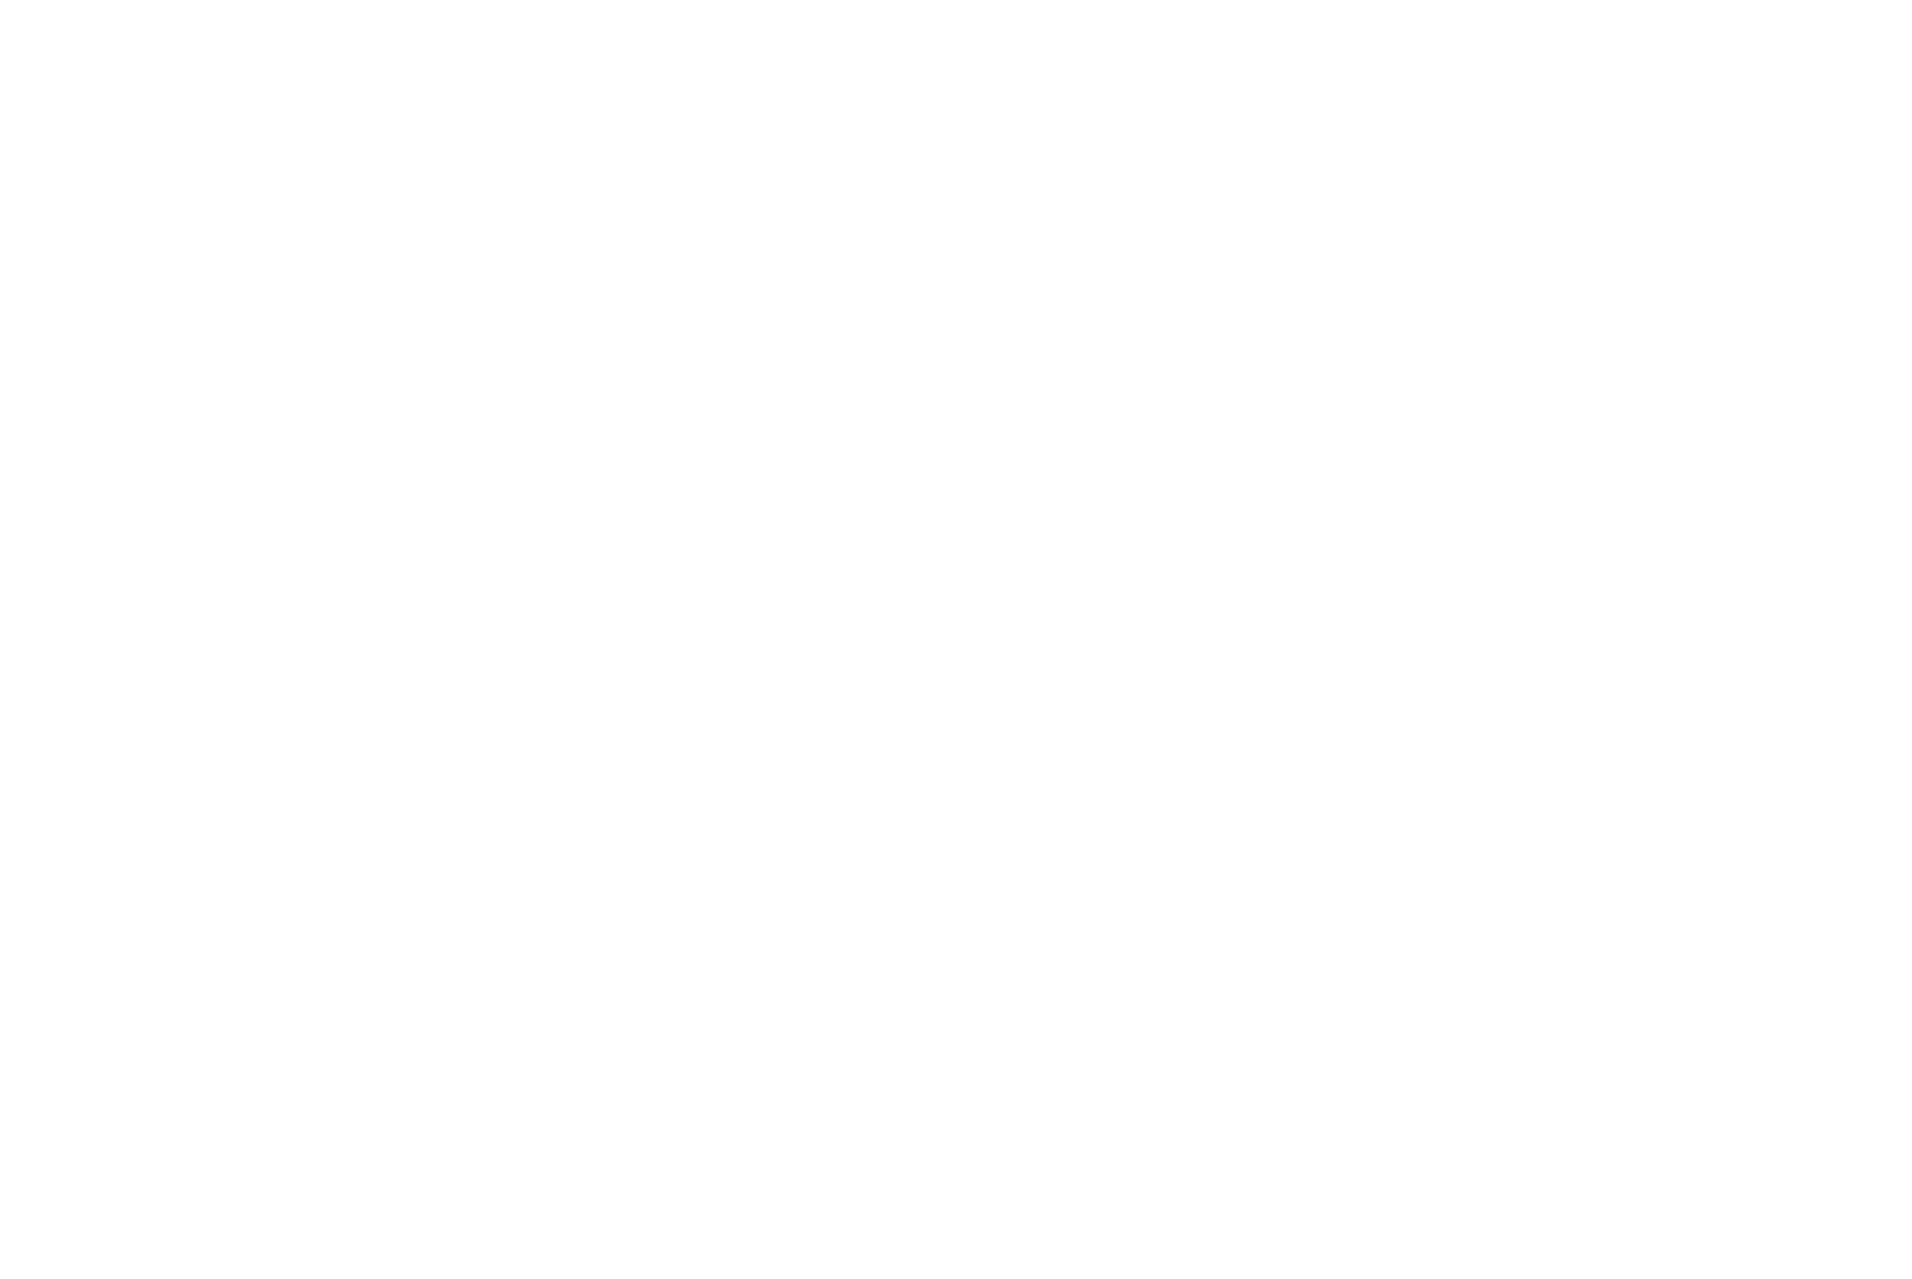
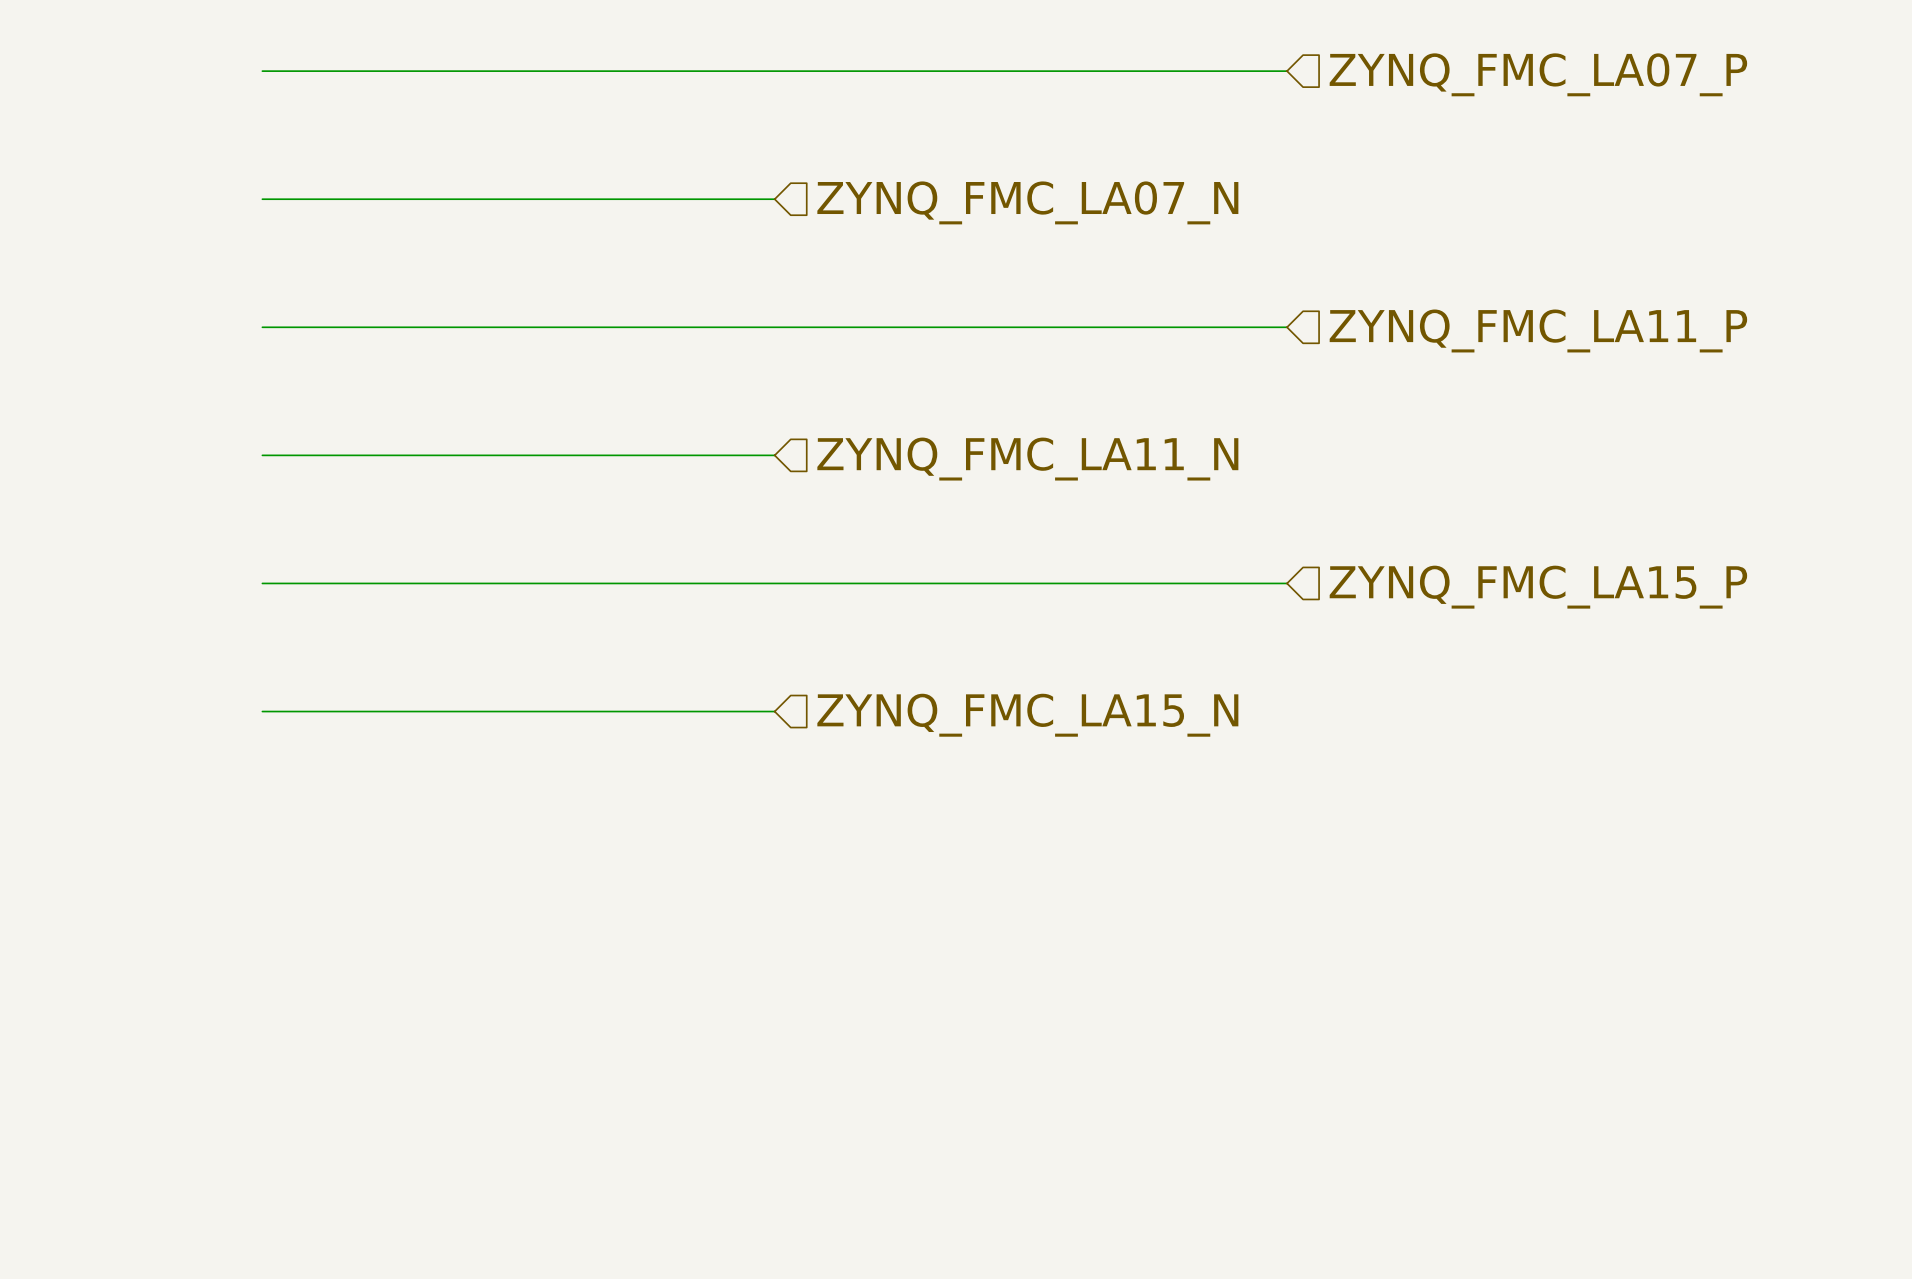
wire: none -> (262, 71) (1287, 71)
hierarchical label: none -> ZYNQ_FMC_LA07_P (1538, 74)
wire: none -> (262, 199) (774, 199)
hierarchical label: none -> ZYNQ_FMC_LA07_N (1027, 202)
wire: none -> (262, 327) (1287, 327)
hierarchical label: none -> ZYNQ_FMC_LA11_P (1538, 330)
wire: none -> (262, 455) (774, 455)
hierarchical label: none -> ZYNQ_FMC_LA11_N (1027, 459)
wire: none -> (262, 583) (1287, 583)
hierarchical label: none -> ZYNQ_FMC_LA15_P (1538, 587)
wire: none -> (262, 711) (774, 711)
hierarchical label: none -> ZYNQ_FMC_LA15_N (1027, 715)

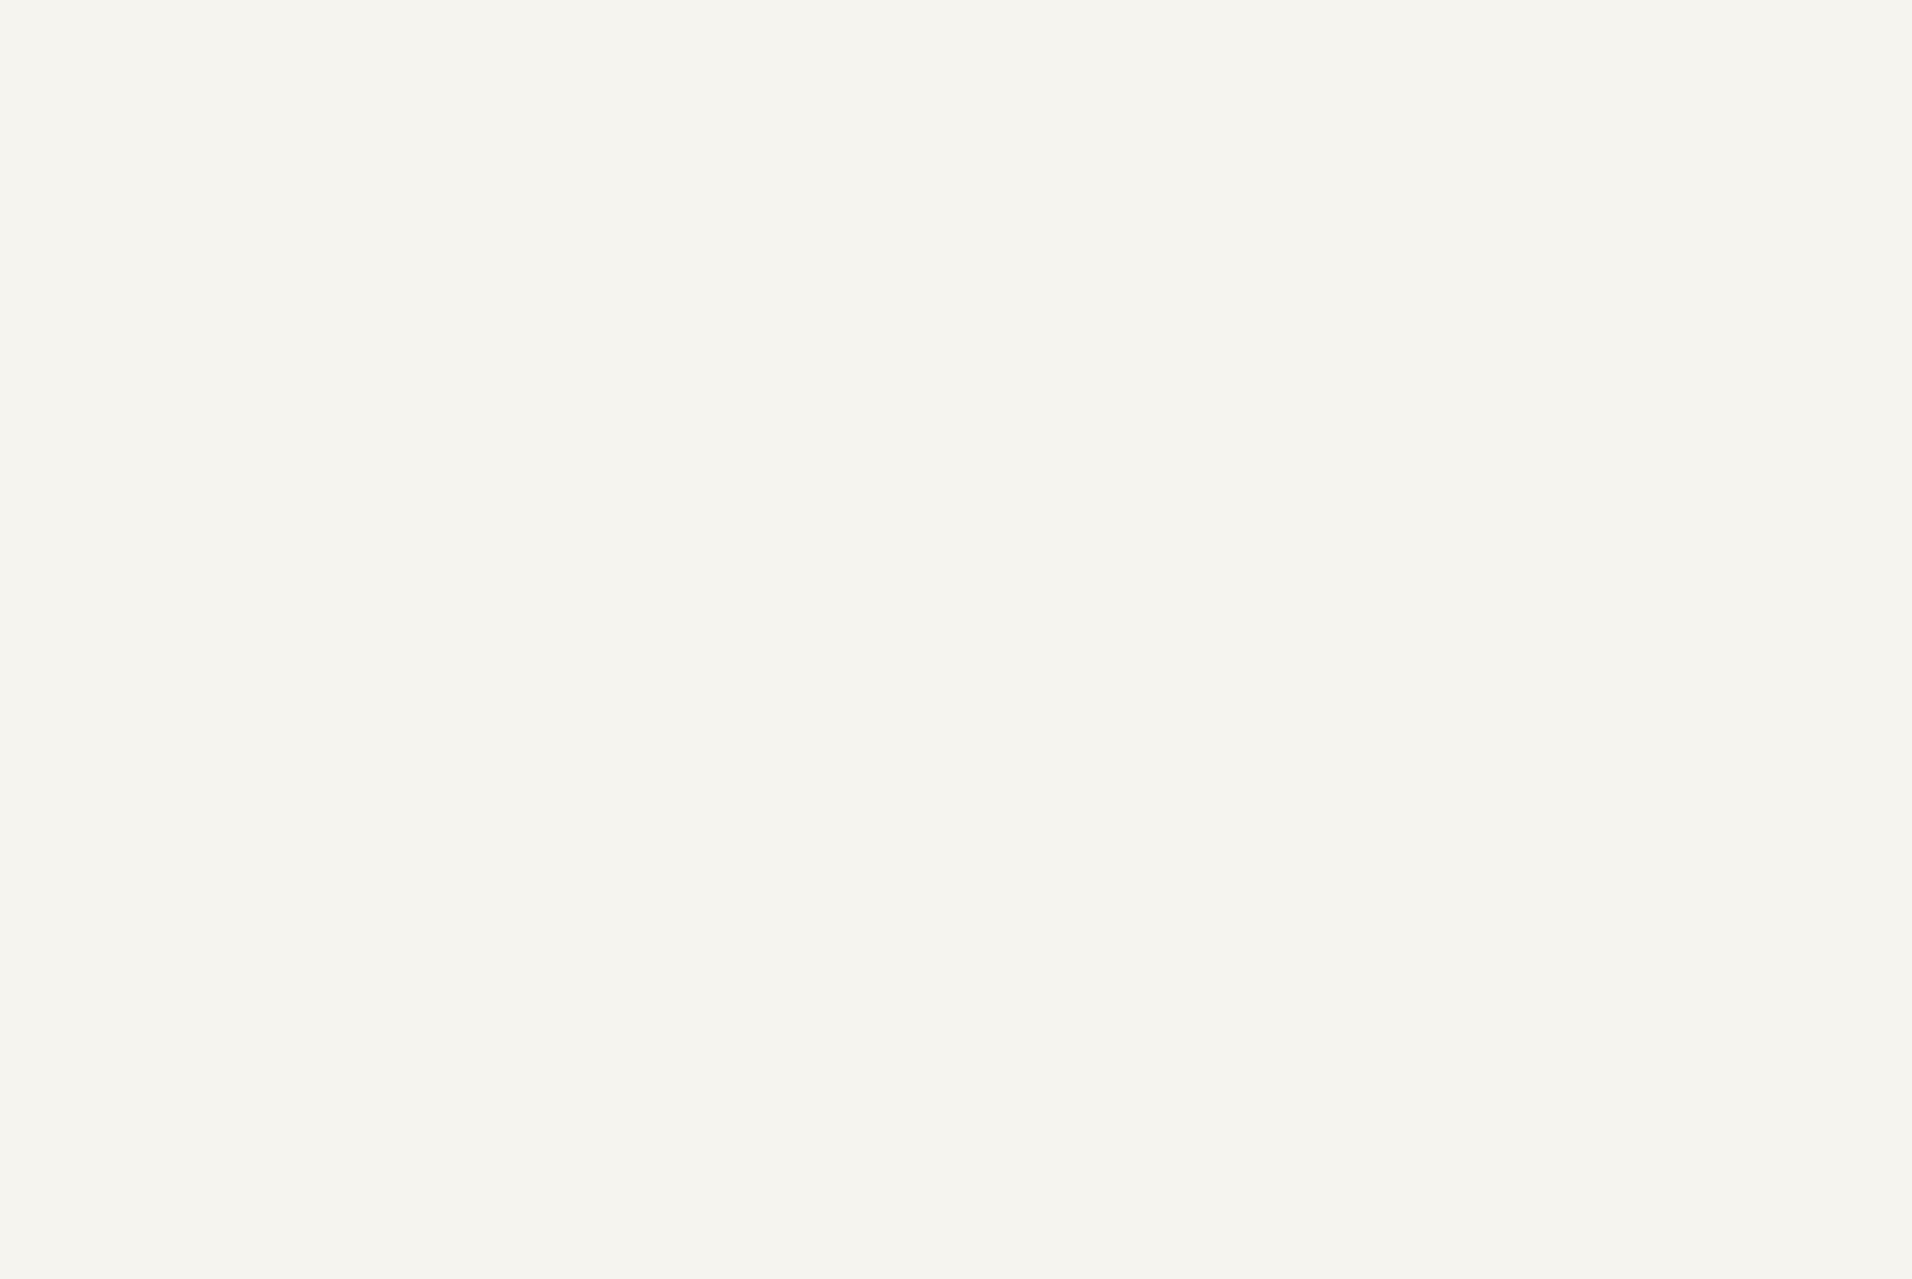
wire: (262, 71) (1287, 71) -> none
hierarchical label: ZYNQ_FMC_LA07_P (1538, 74) -> none
wire: (262, 199) (774, 199) -> none
hierarchical label: ZYNQ_FMC_LA07_N (1027, 202) -> none
wire: (262, 327) (1287, 327) -> none
hierarchical label: ZYNQ_FMC_LA11_P (1538, 330) -> none
wire: (262, 455) (774, 455) -> none
hierarchical label: ZYNQ_FMC_LA11_N (1027, 459) -> none
wire: (262, 583) (1287, 583) -> none
hierarchical label: ZYNQ_FMC_LA15_P (1538, 587) -> none
wire: (262, 711) (774, 711) -> none
hierarchical label: ZYNQ_FMC_LA15_N (1027, 715) -> none

